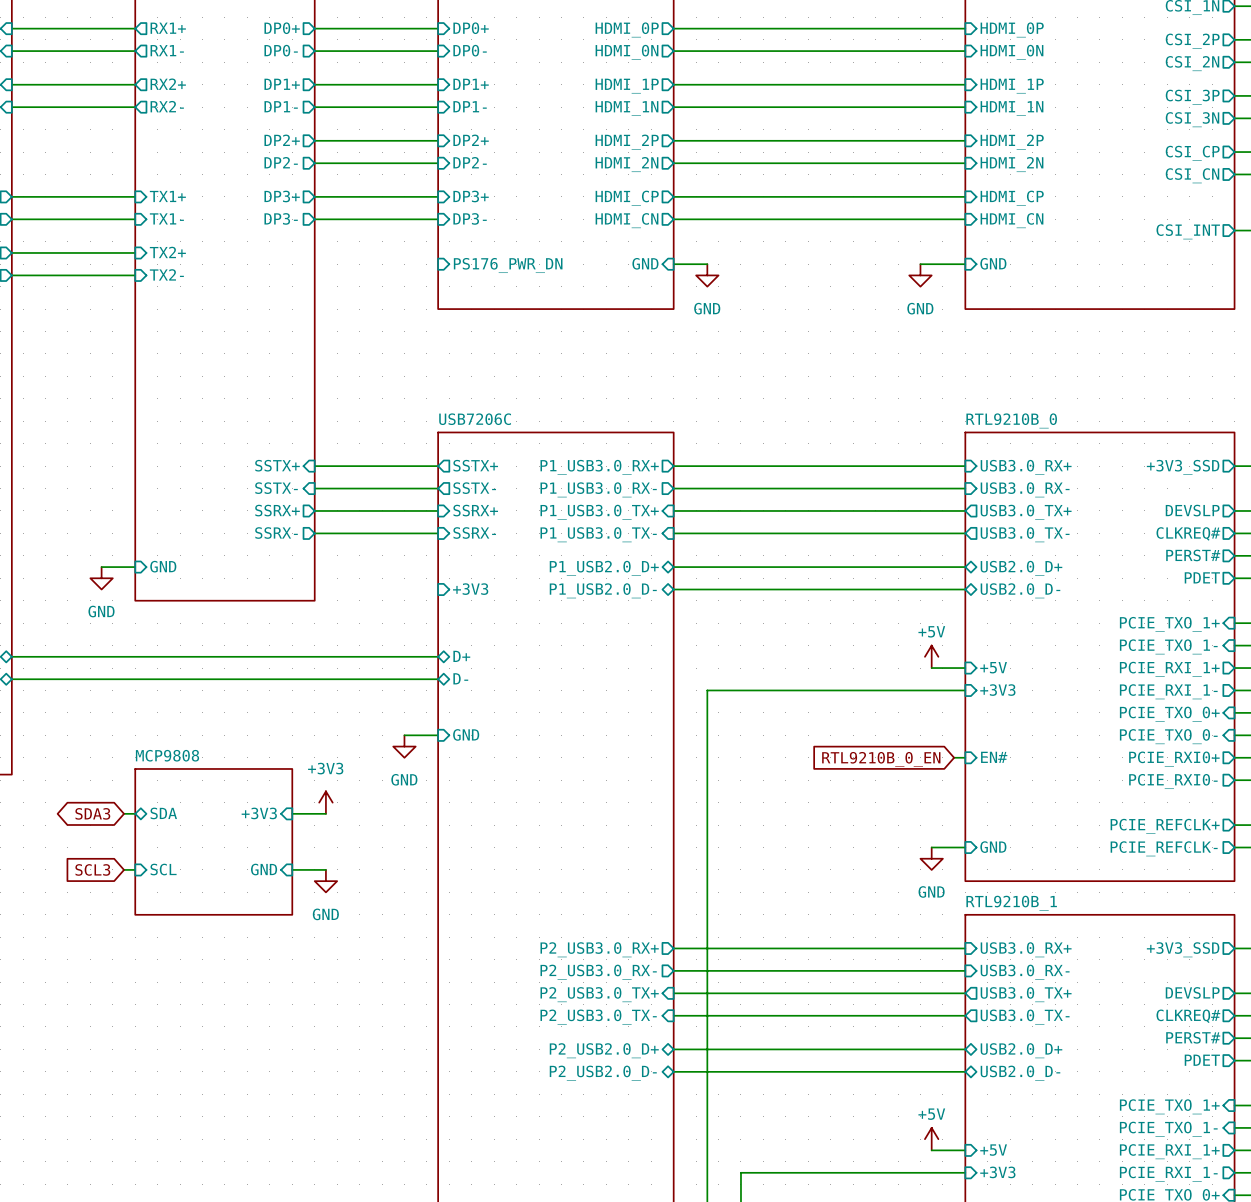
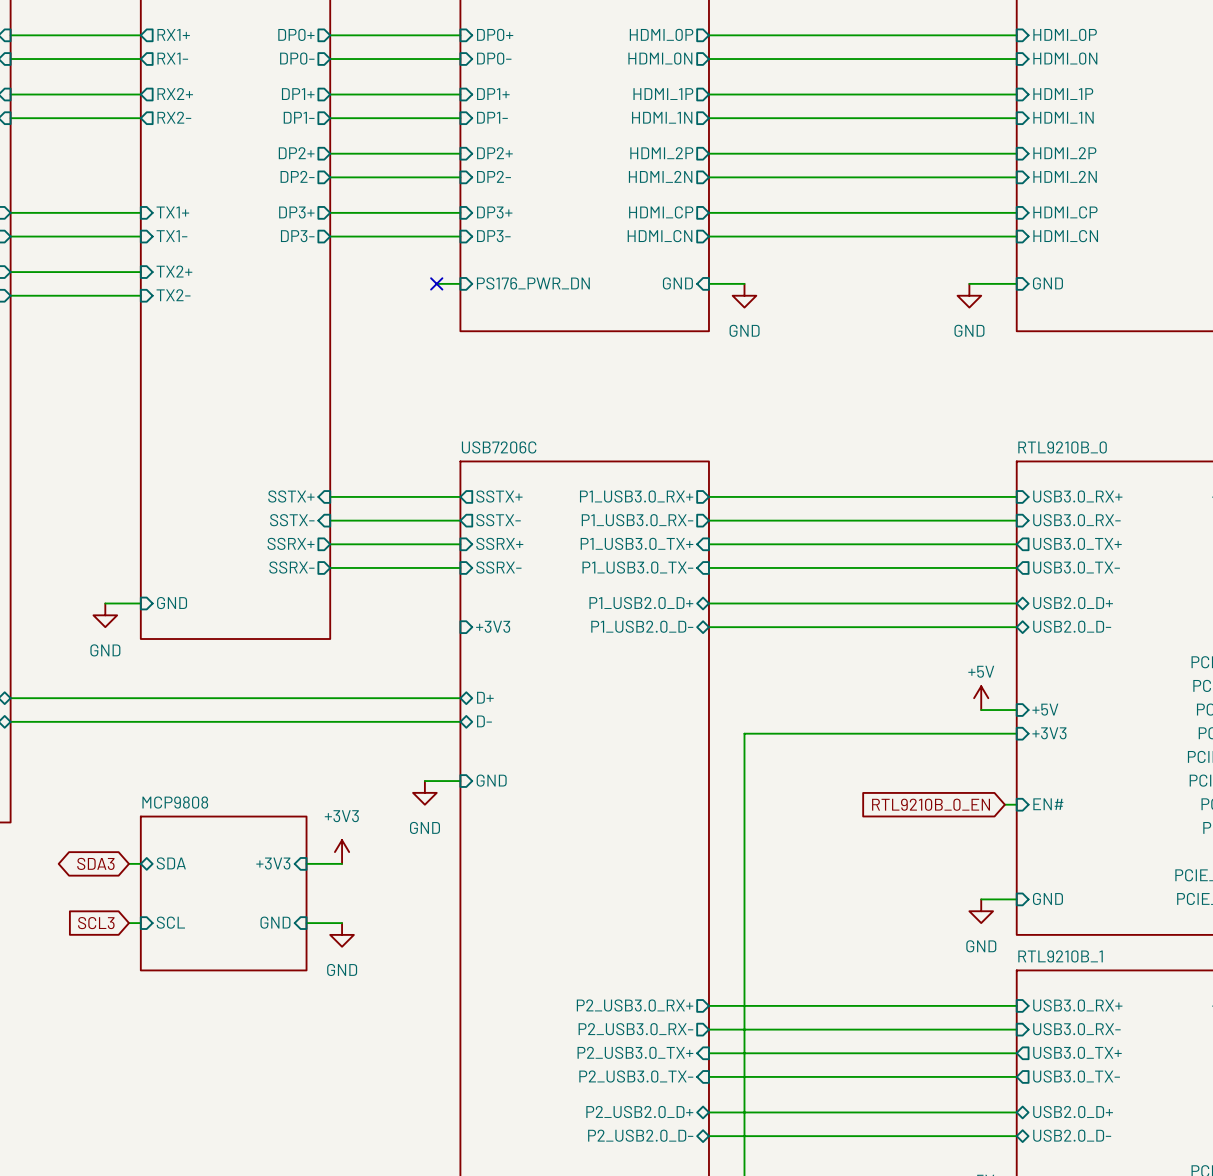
wire: none -> (436, 283) (460, 283)
no-connect mark: none -> (436, 283)

